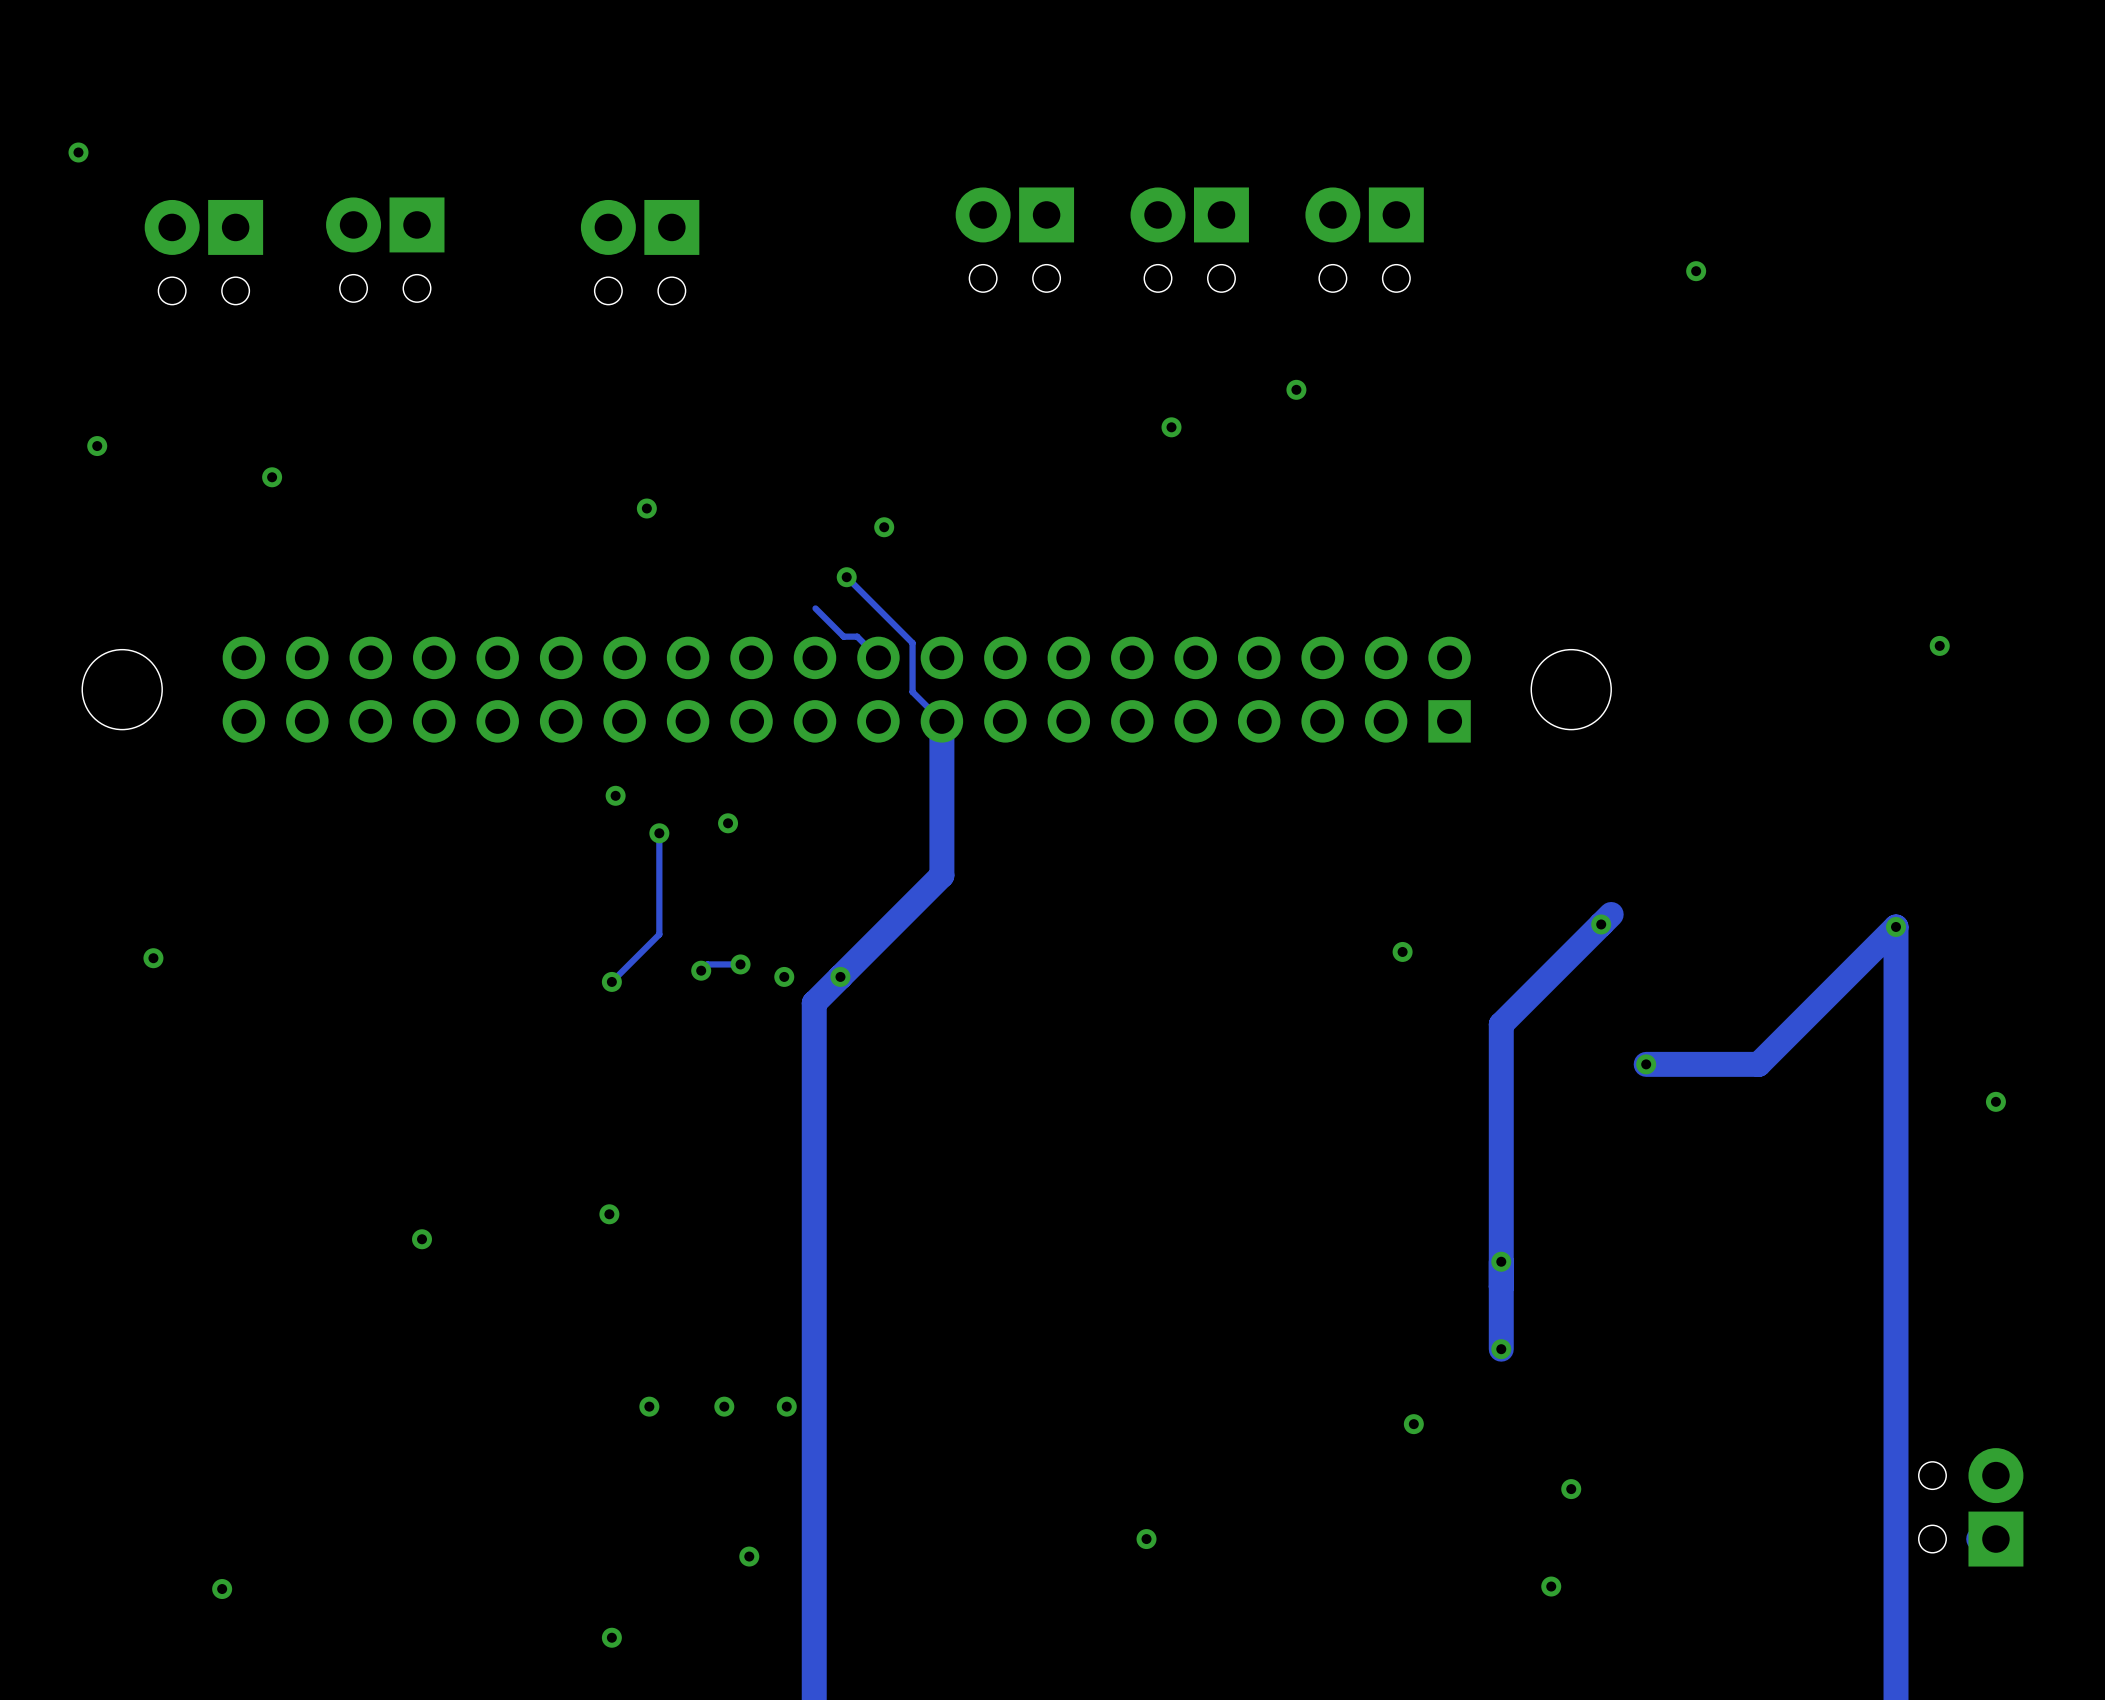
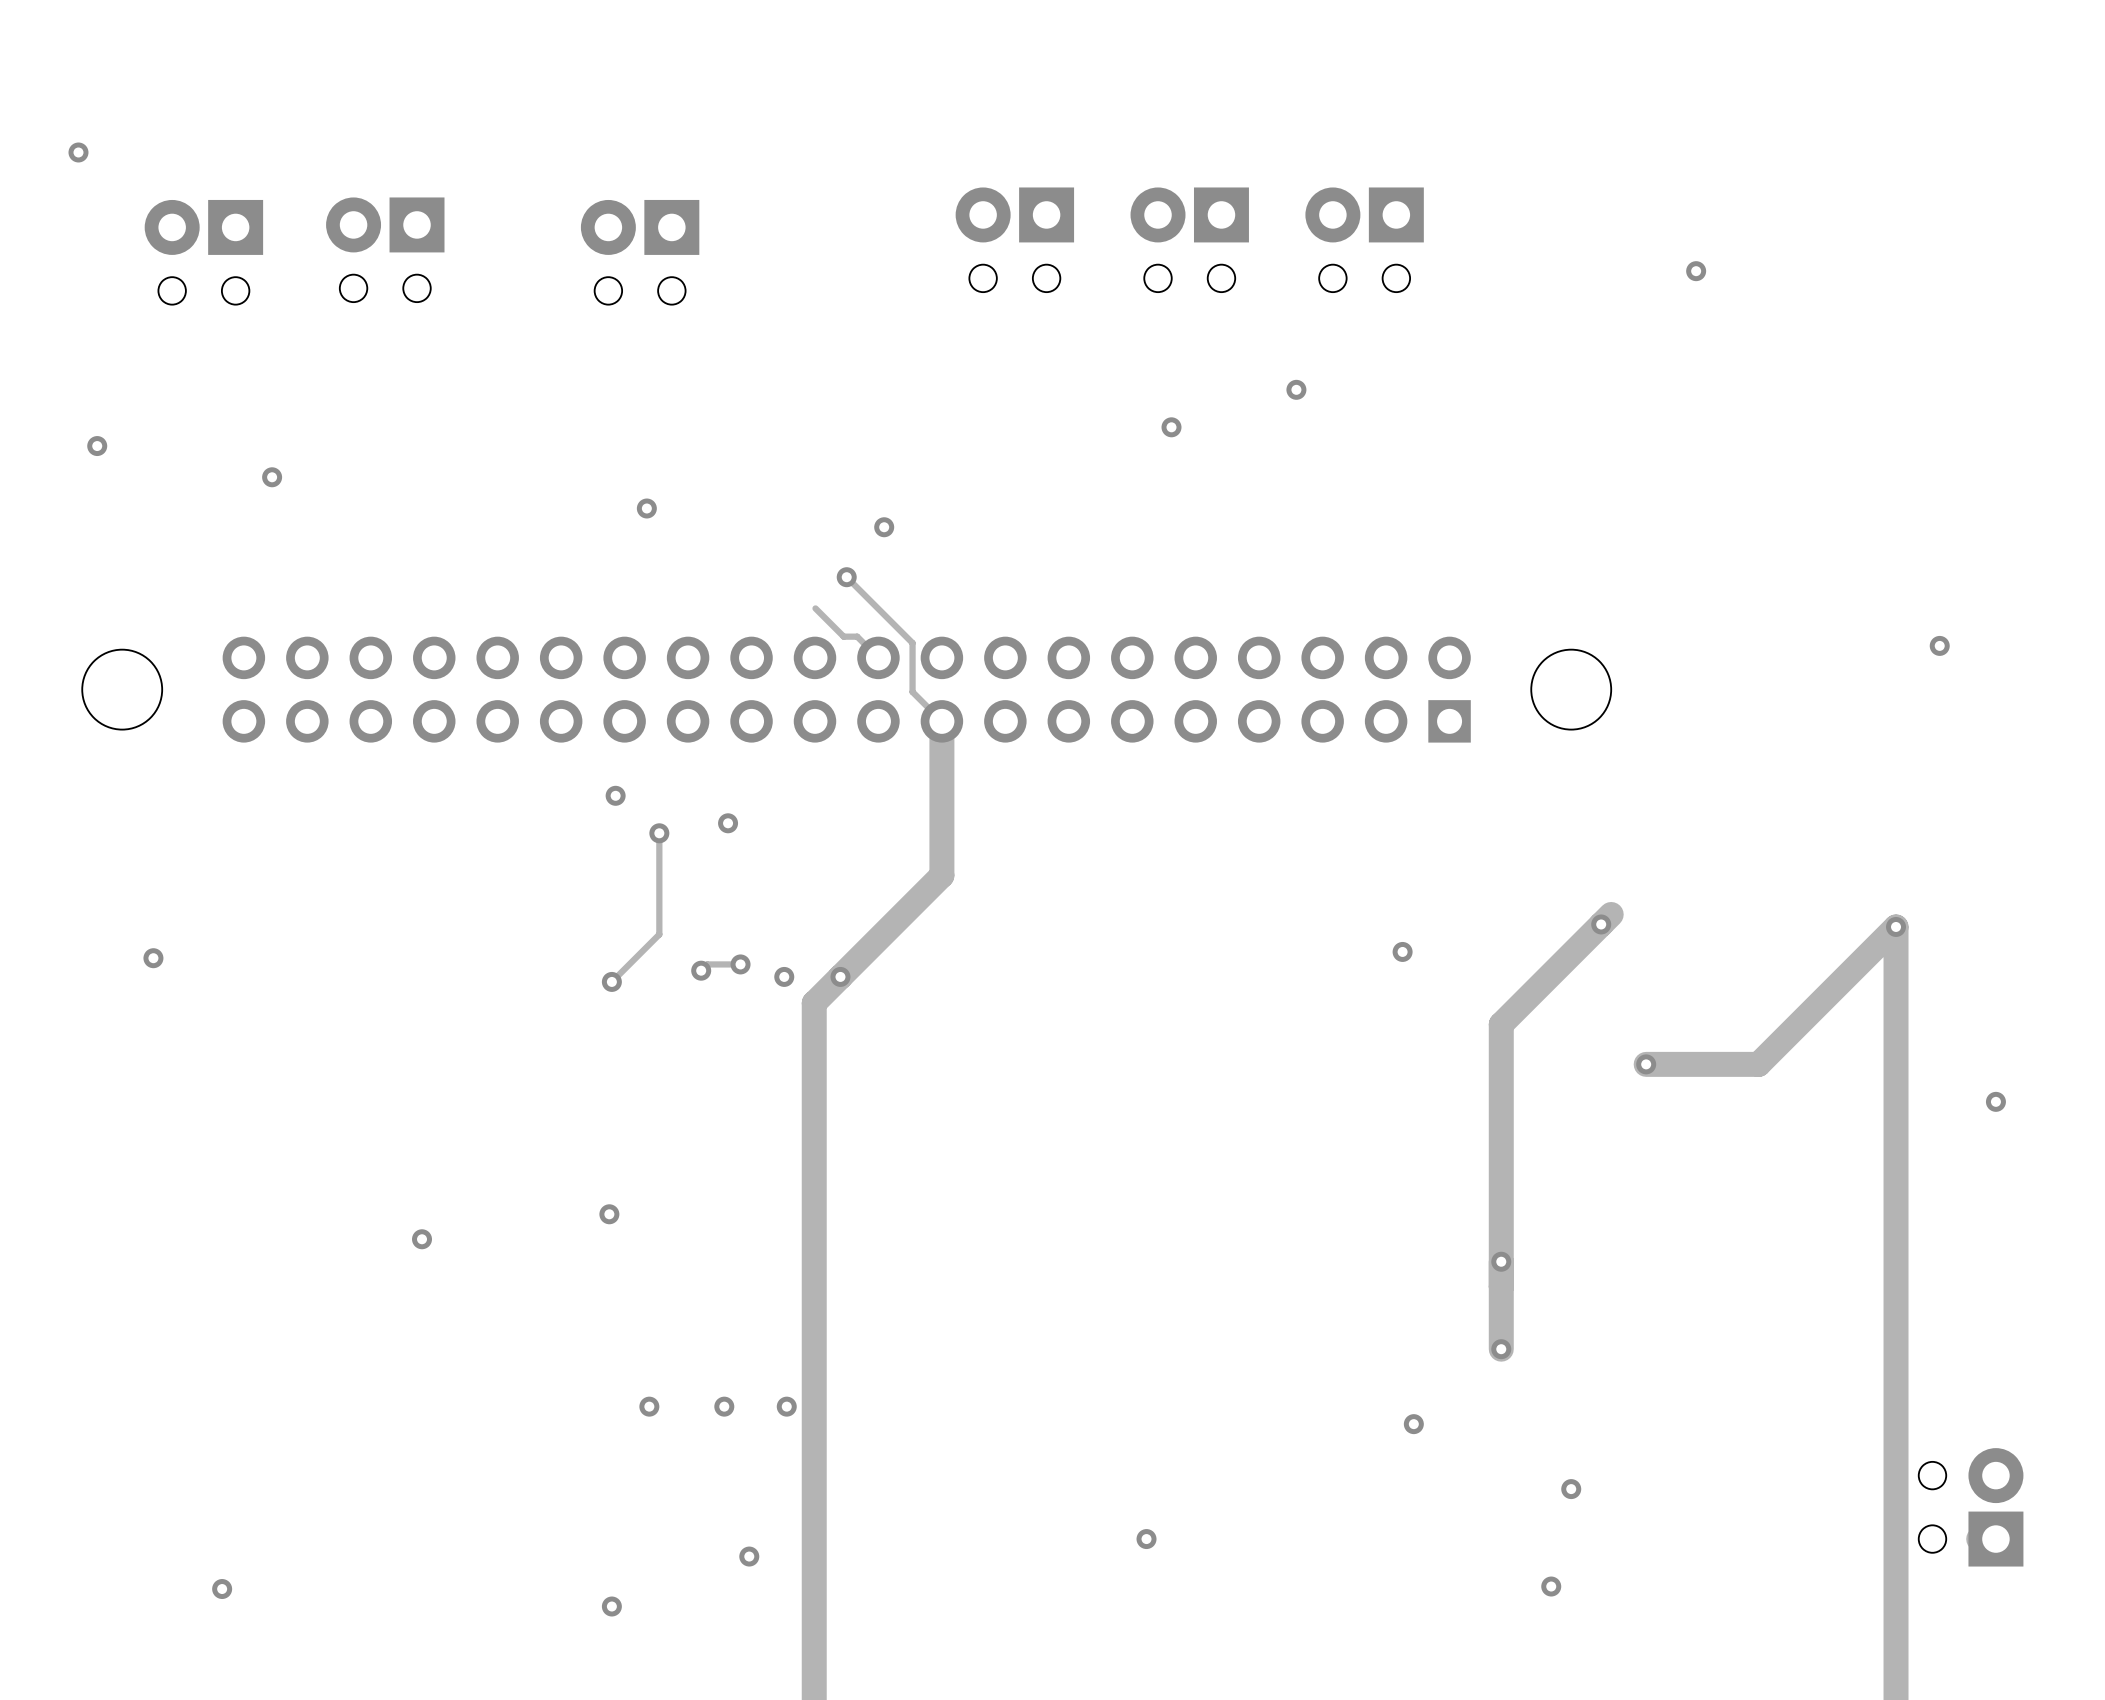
via position: (611, 1637) -> (611, 1606)

